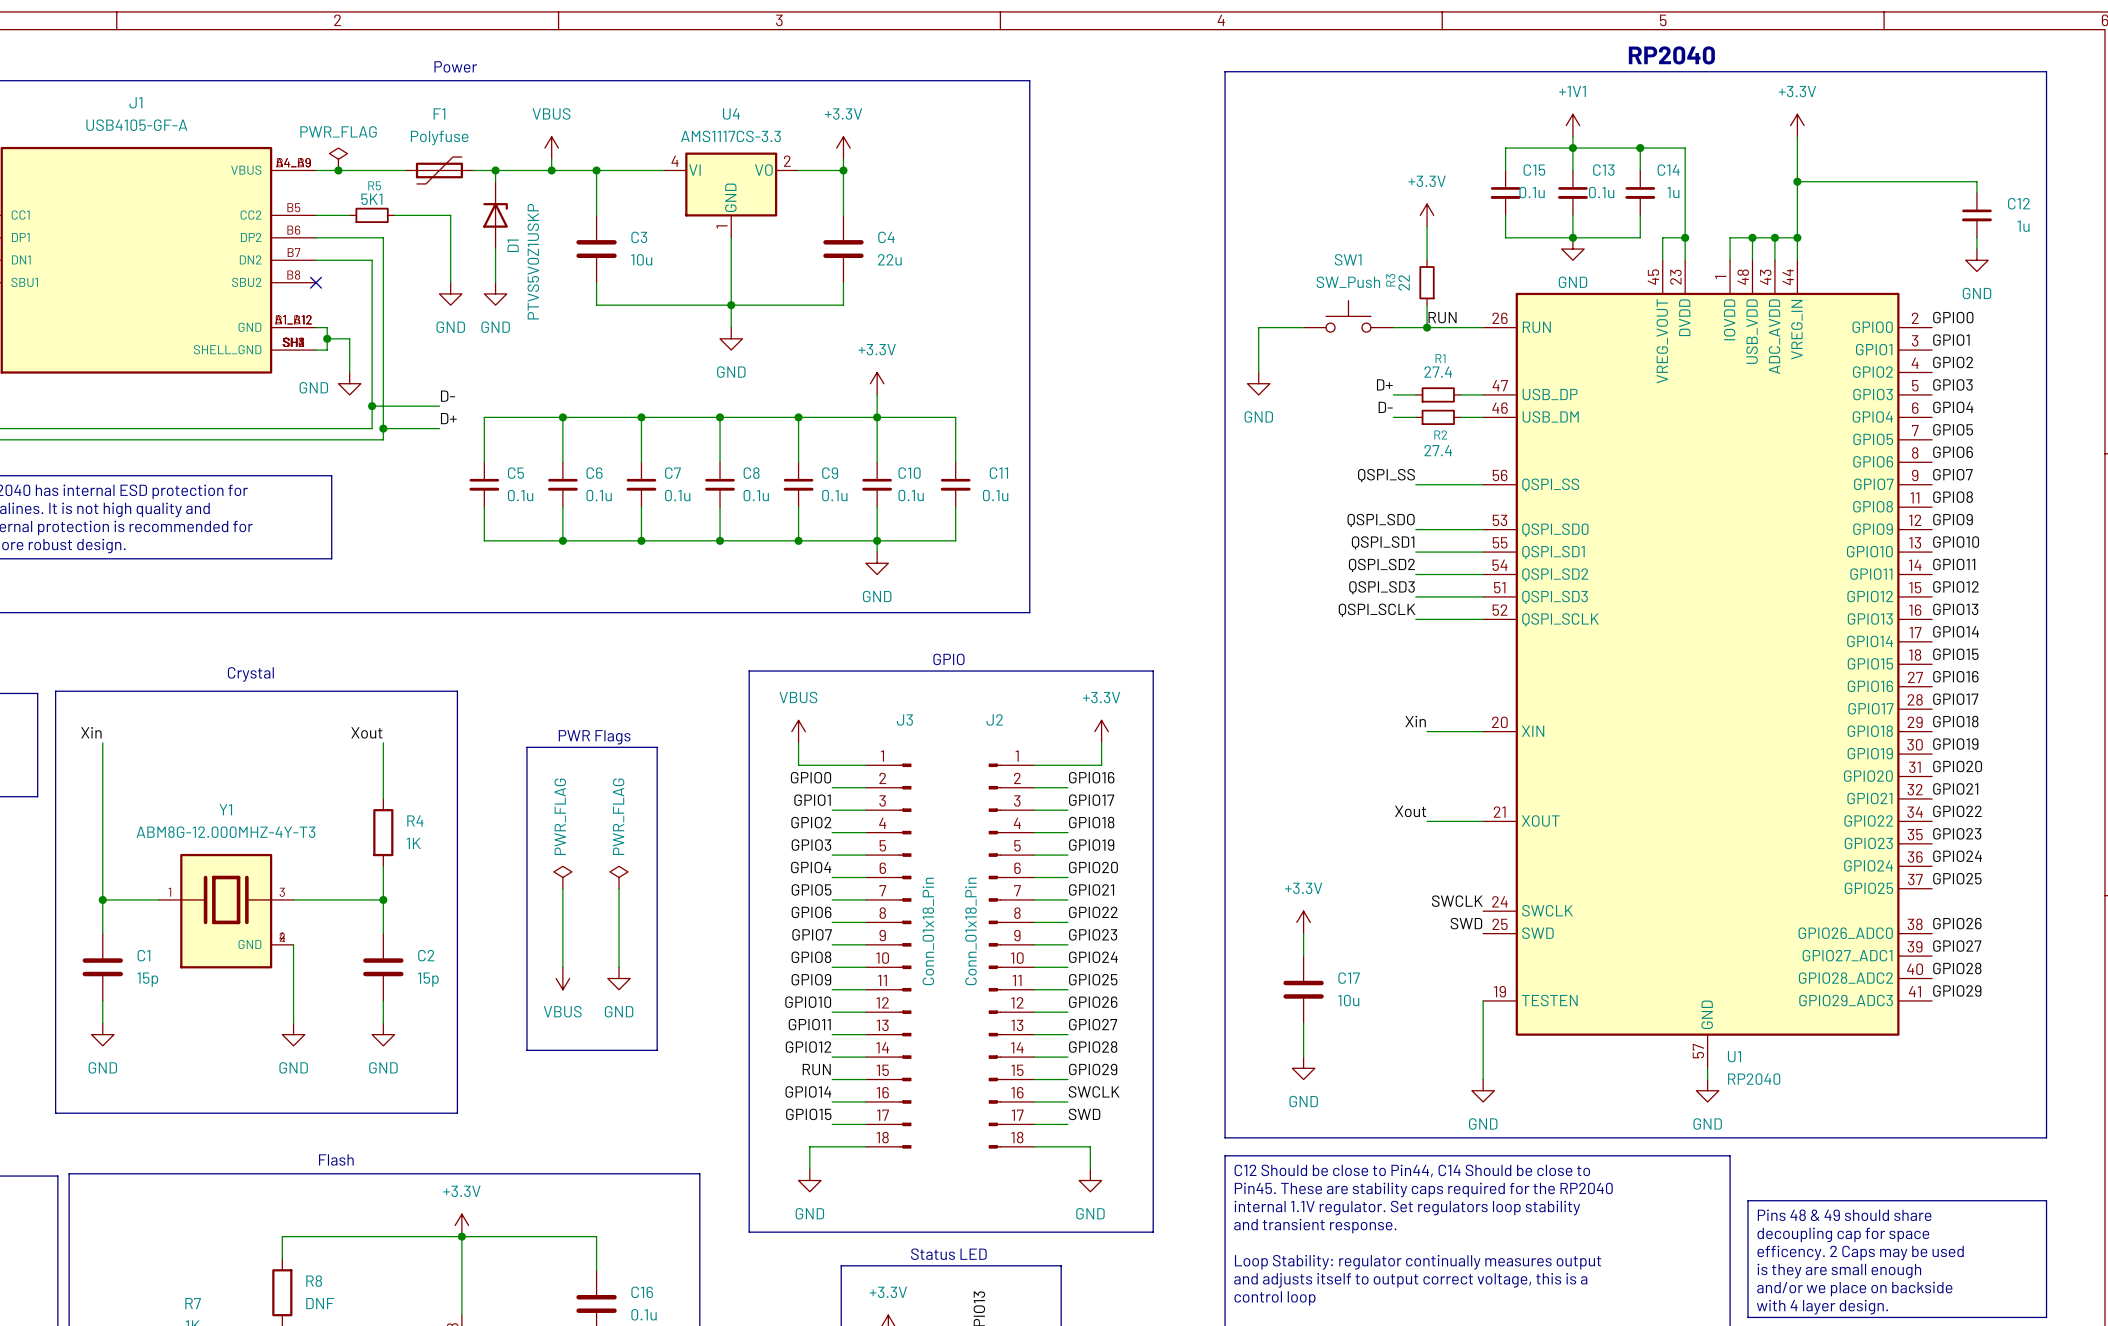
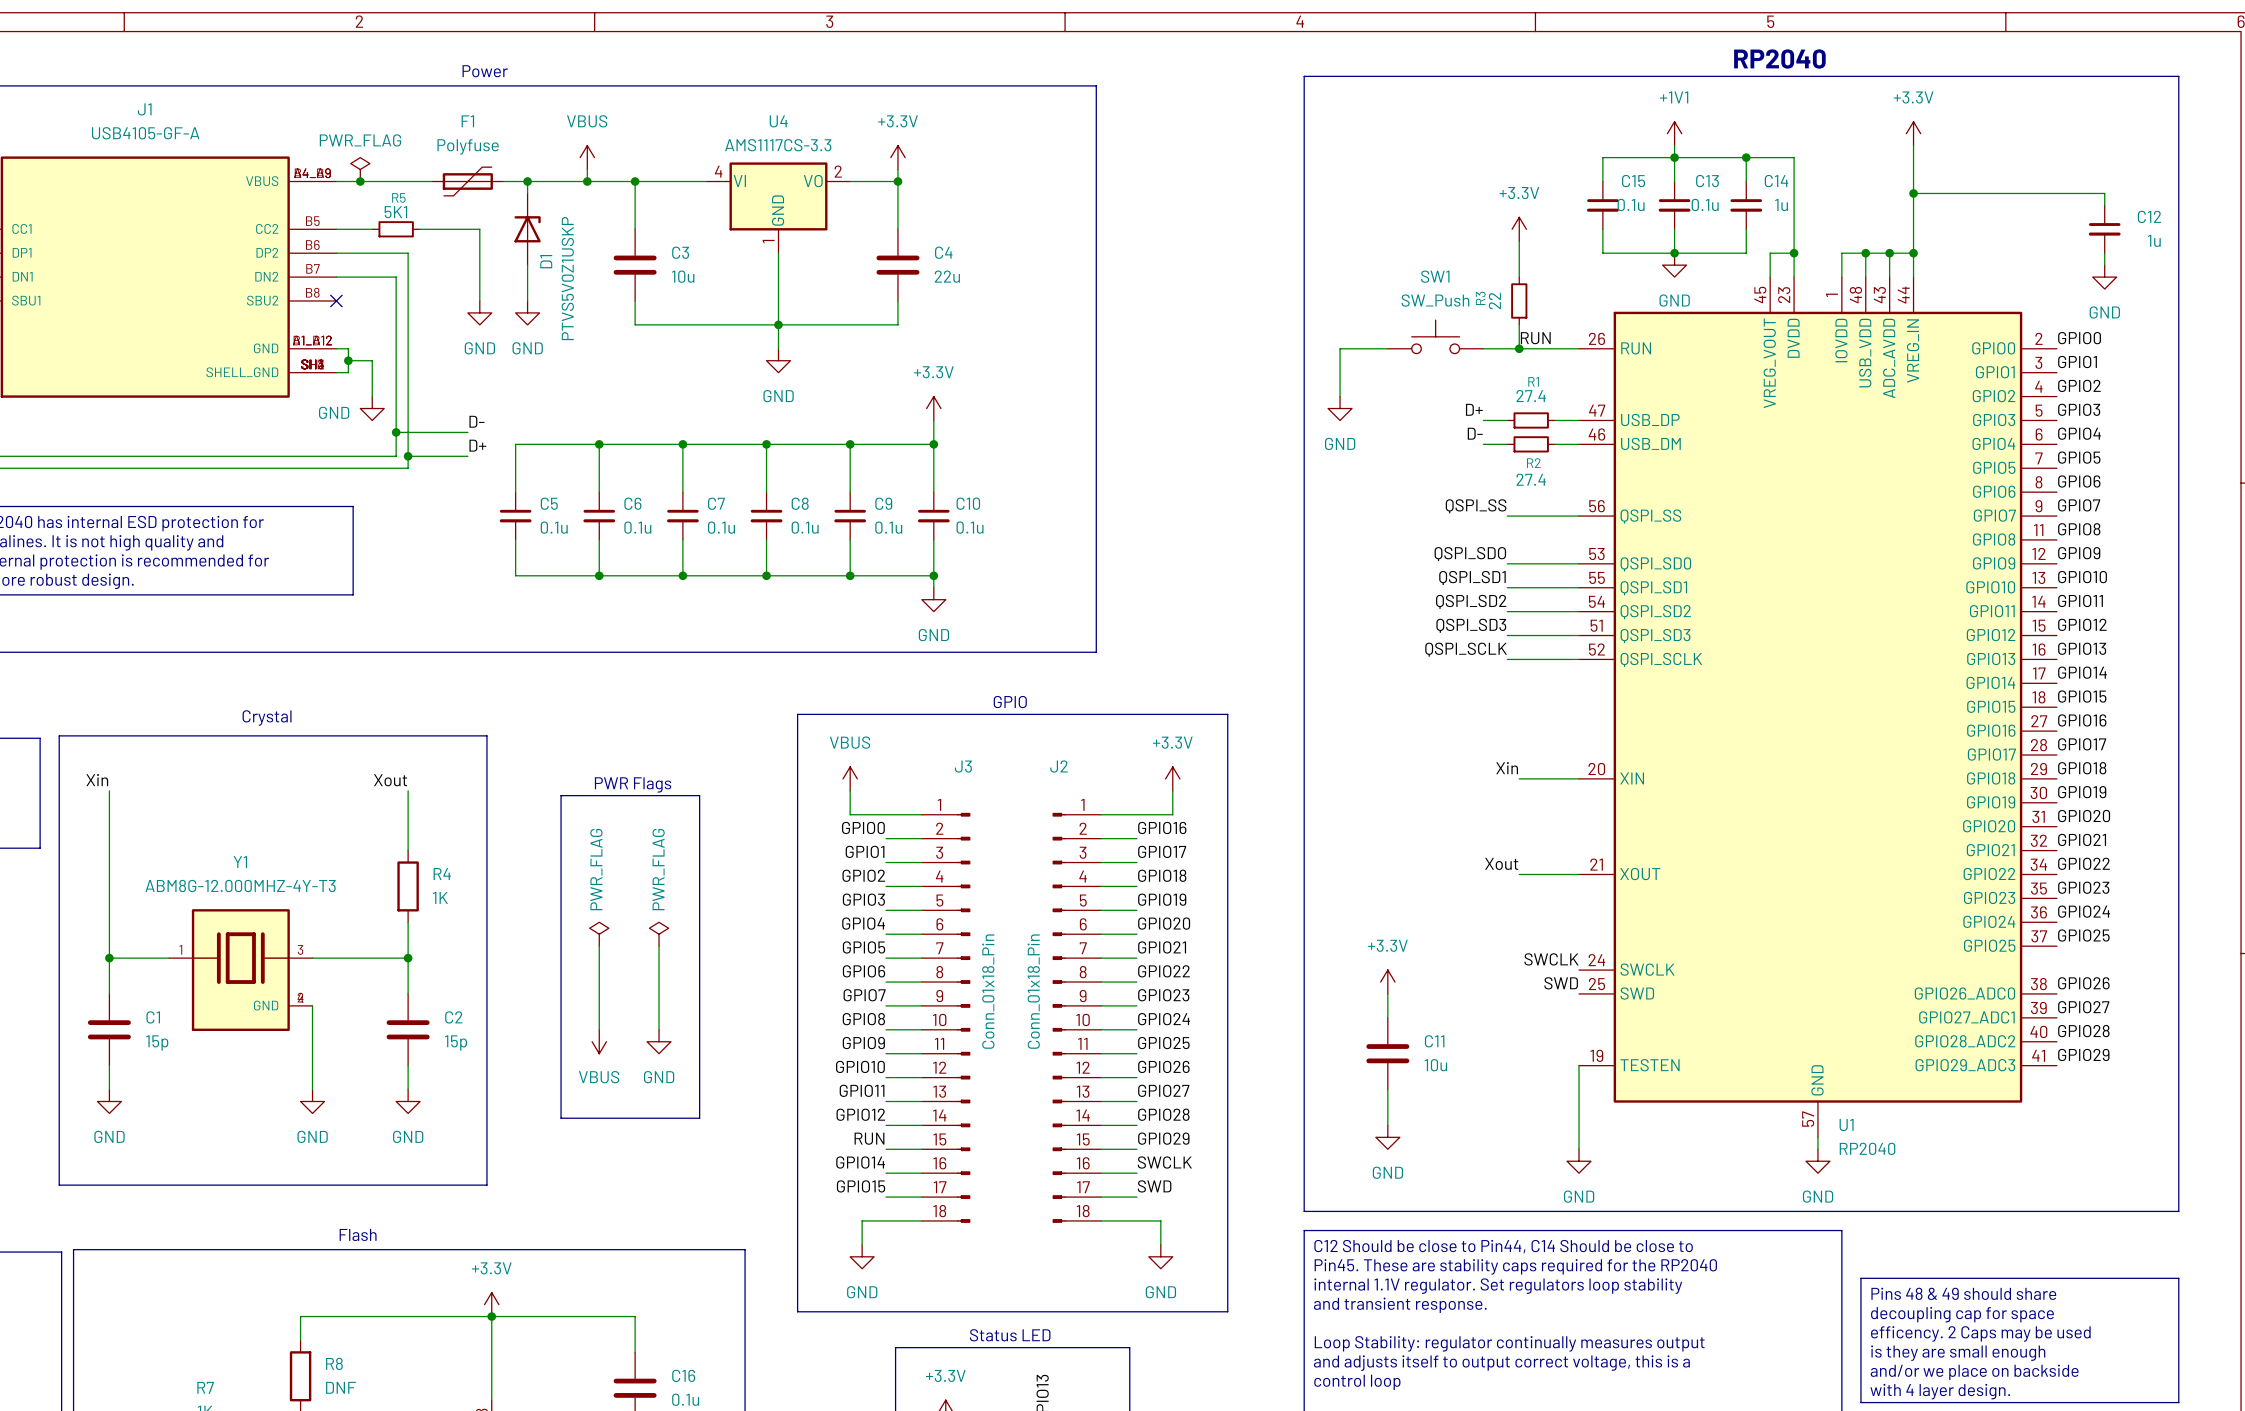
wire: (877, 417) (955, 417) (955, 462) -> none
C11: 0.1u (955, 484) -> none
wire: (955, 507) (955, 540) (877, 540) -> none
C17 name: C17 (1349, 978) -> C11 (1434, 1041)

